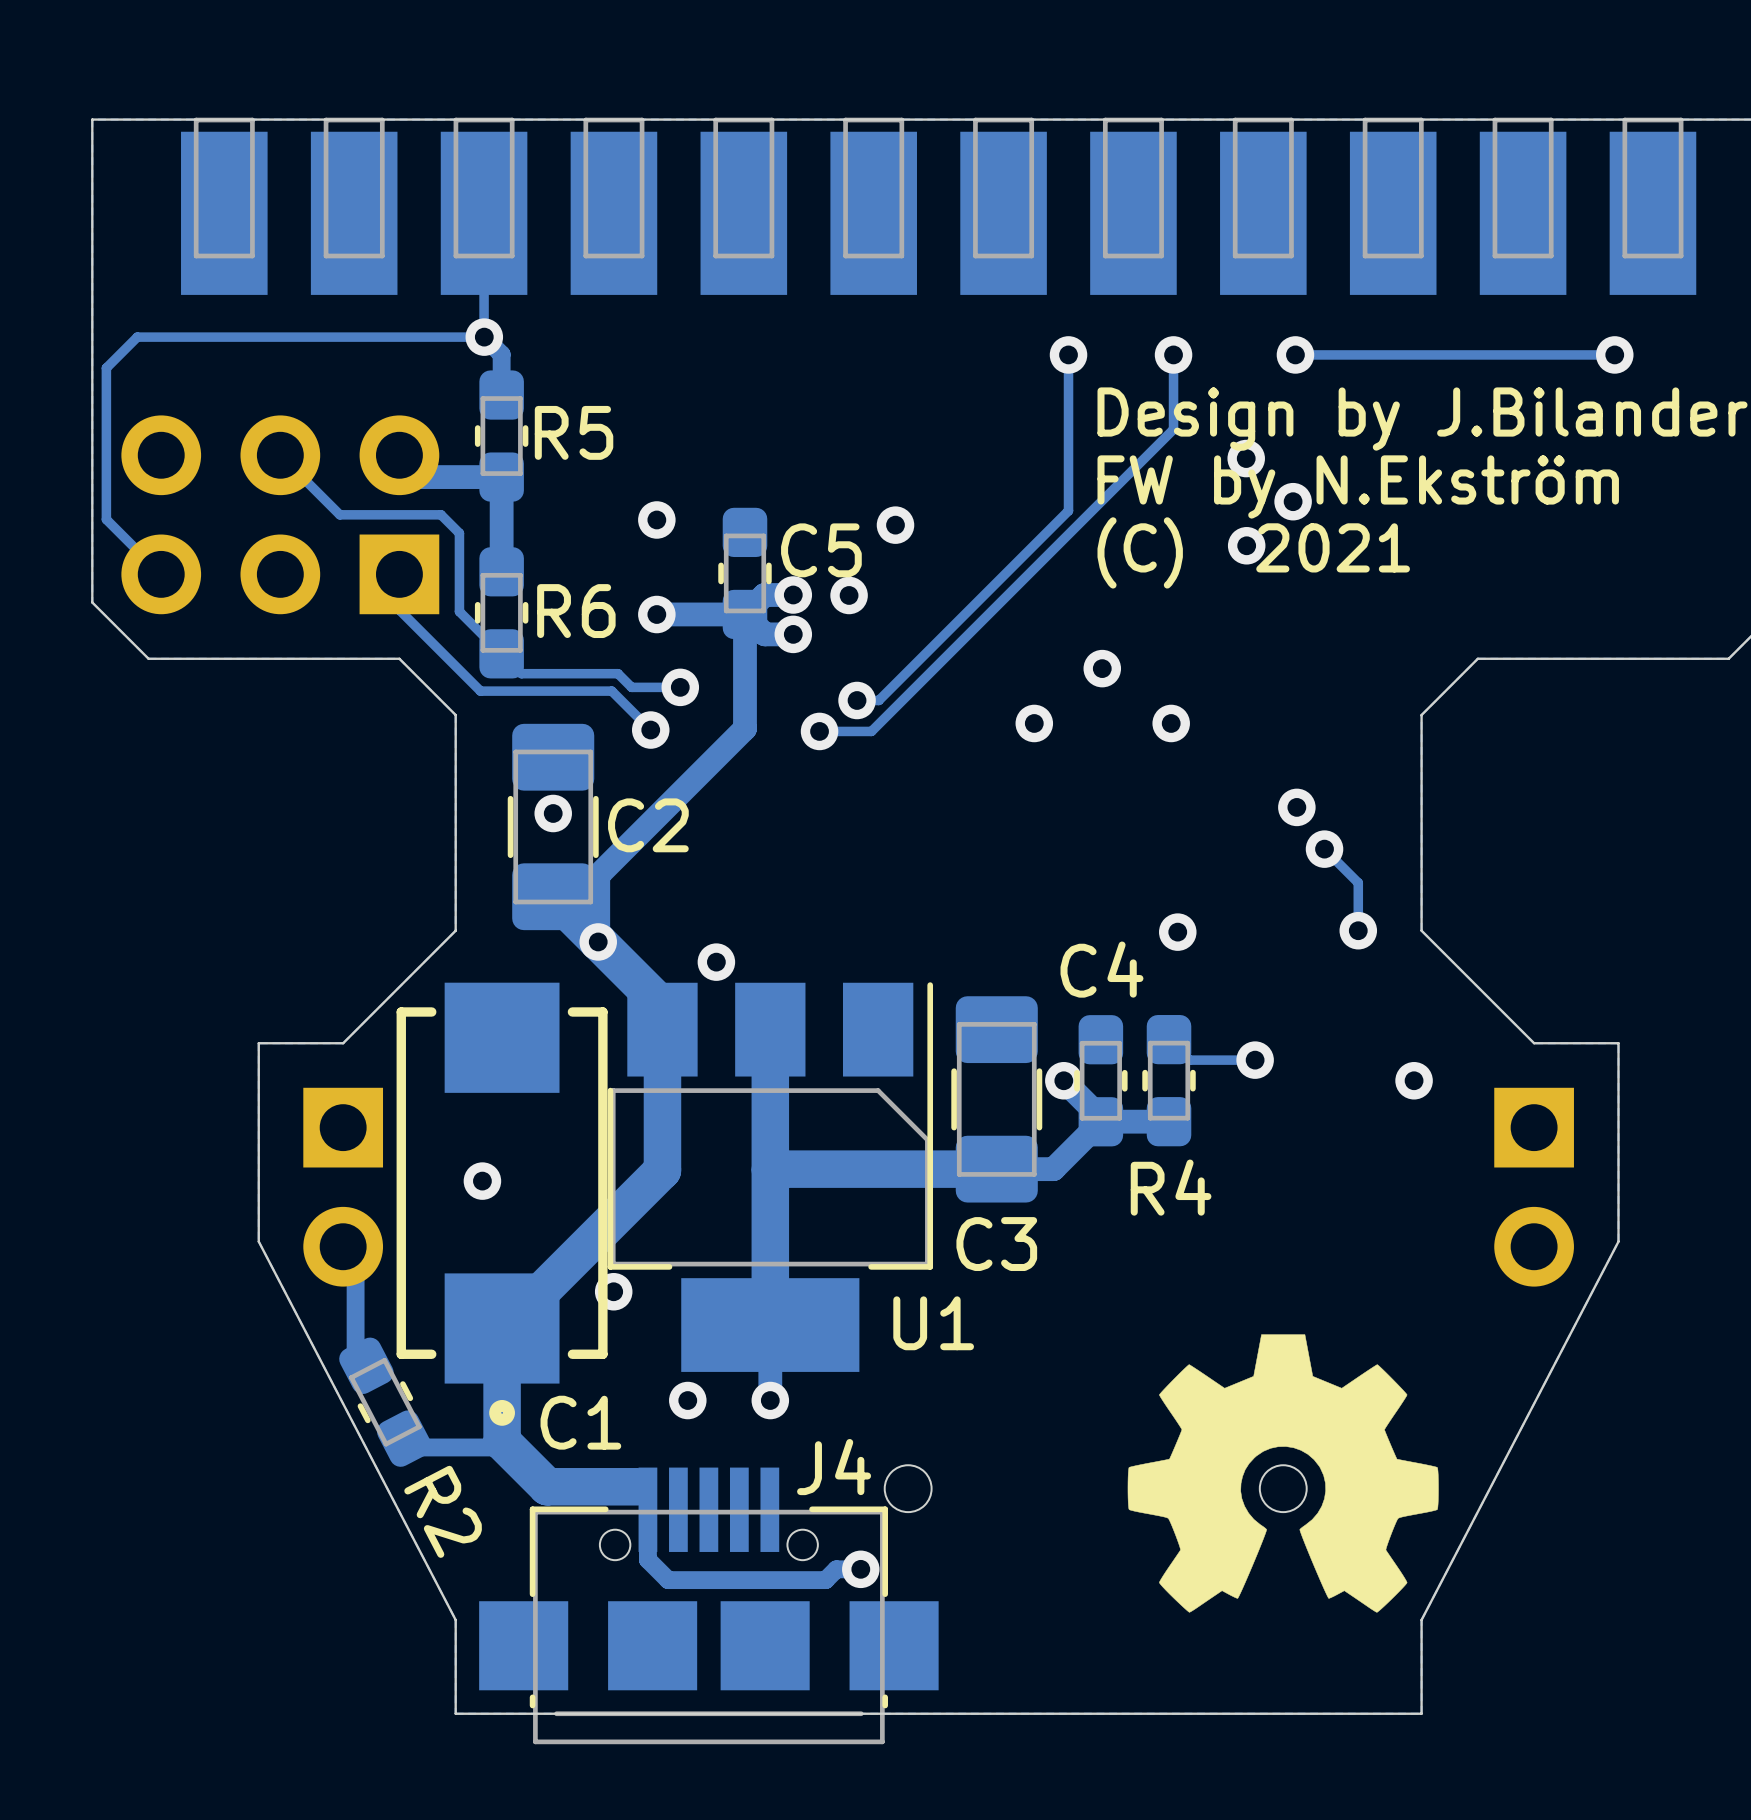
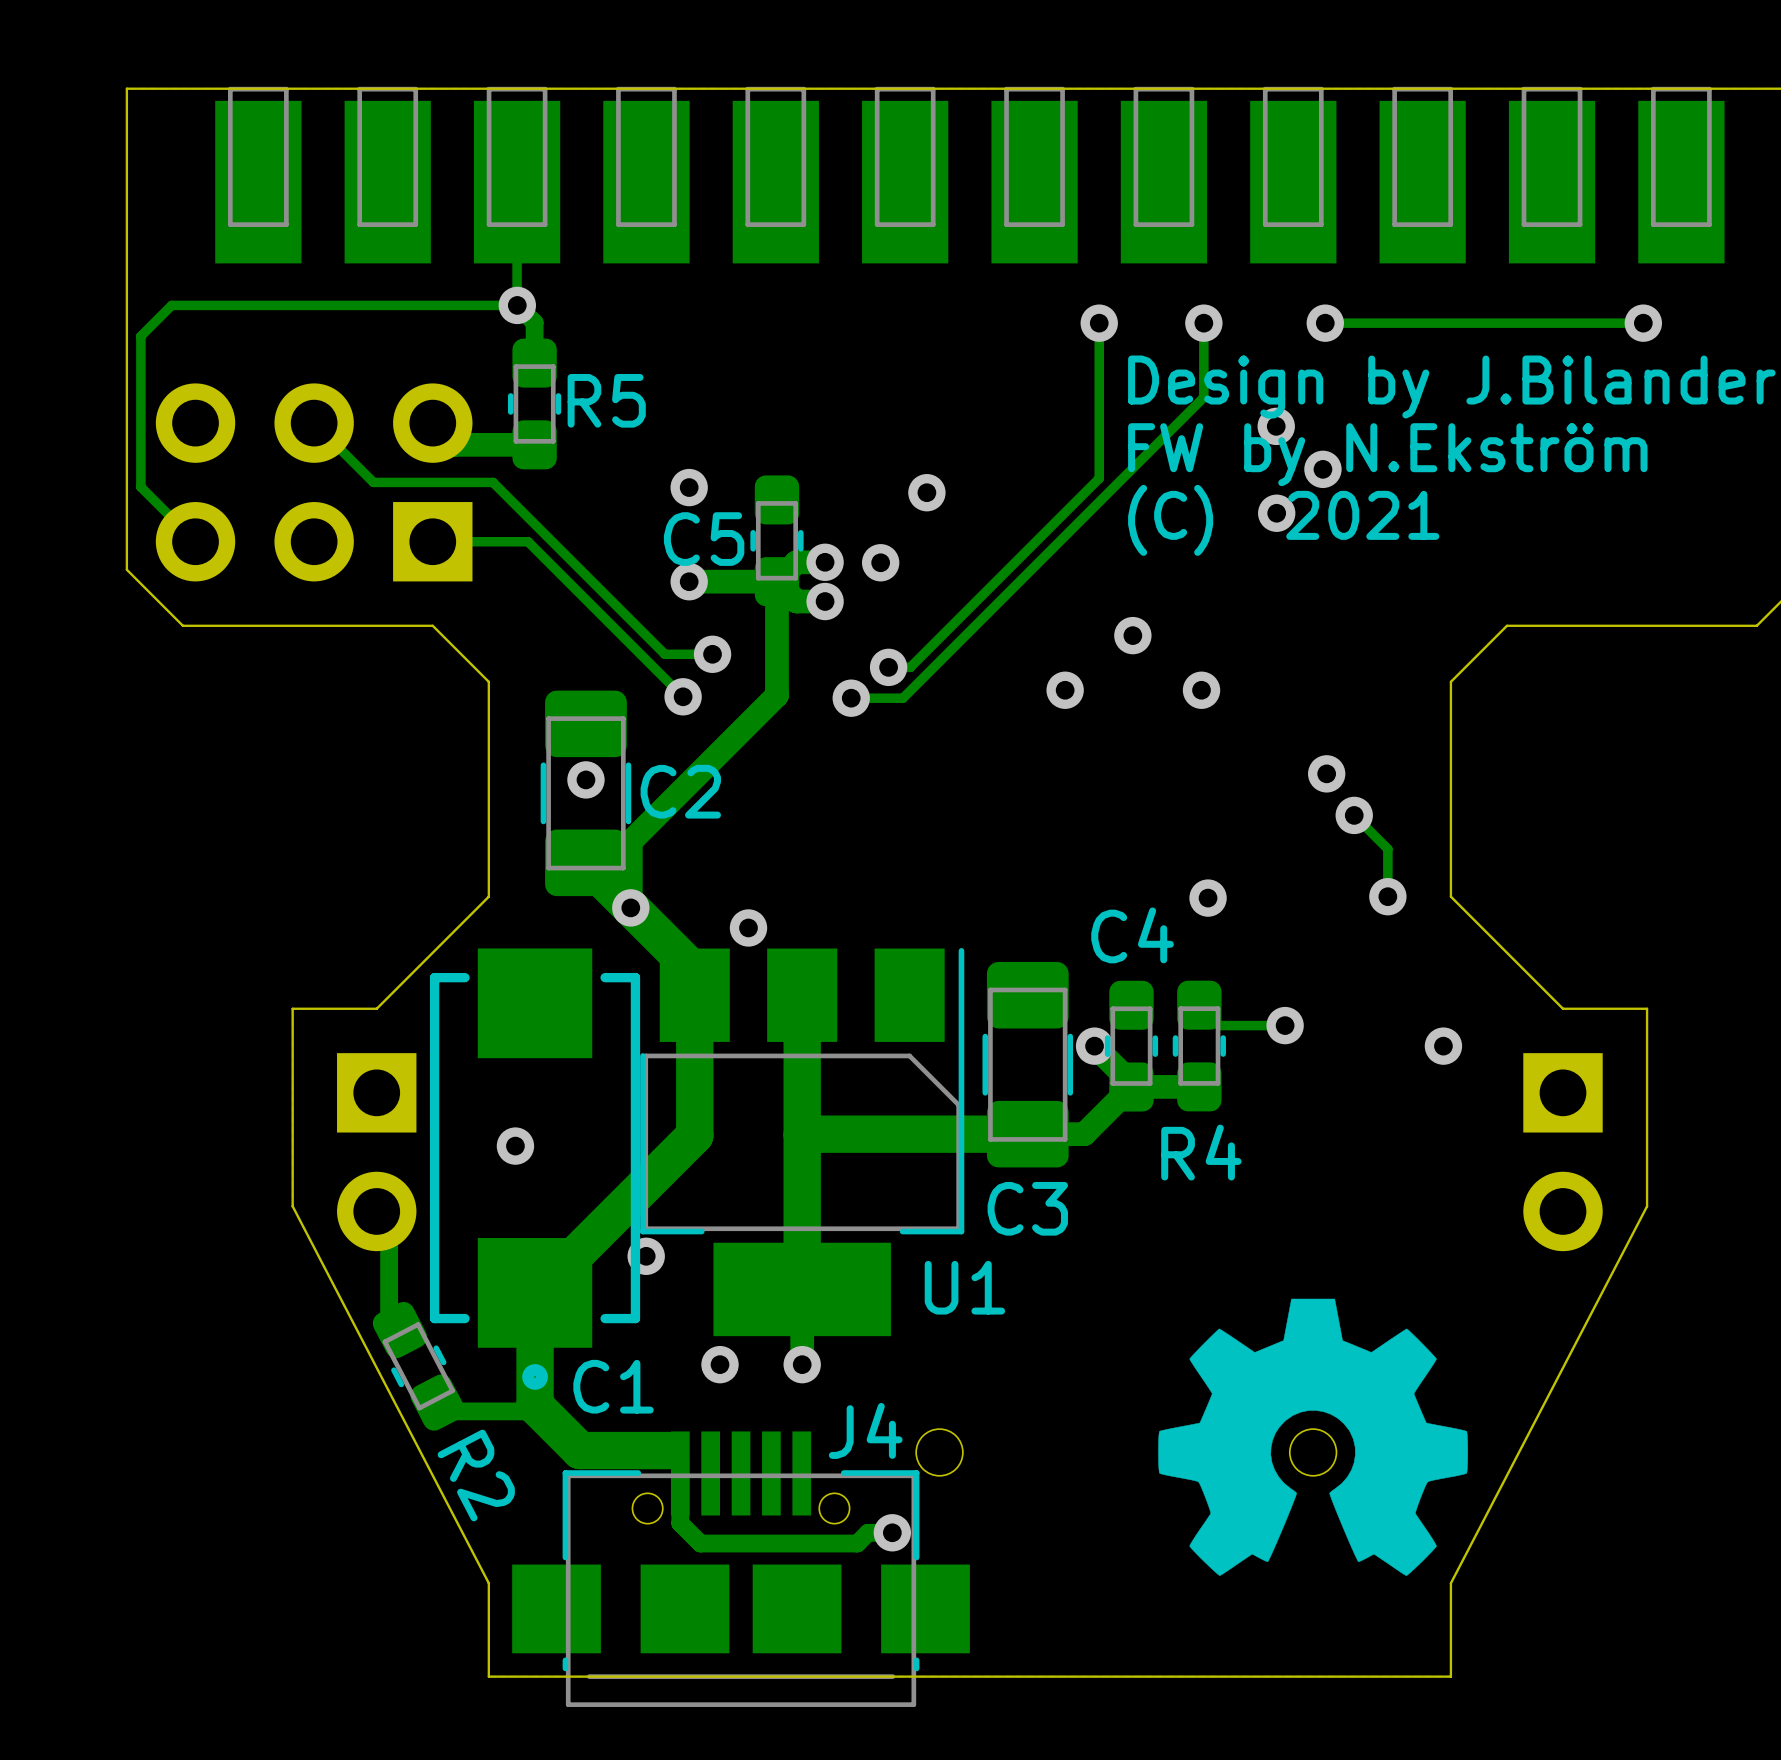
track: (501, 477) (501, 571) -> none
track: (441, 514) (459, 533) (459, 611) (521, 673) (617, 673) (631, 687) -> (474, 482) (493, 482) (664, 654)
C5 name position: C5 (821, 550) -> C5 (704, 539)
track: (399, 574) (399, 610) (480, 691) (611, 691) -> (432, 541) (528, 541) (644, 658)
R6: (501, 612) -> none

